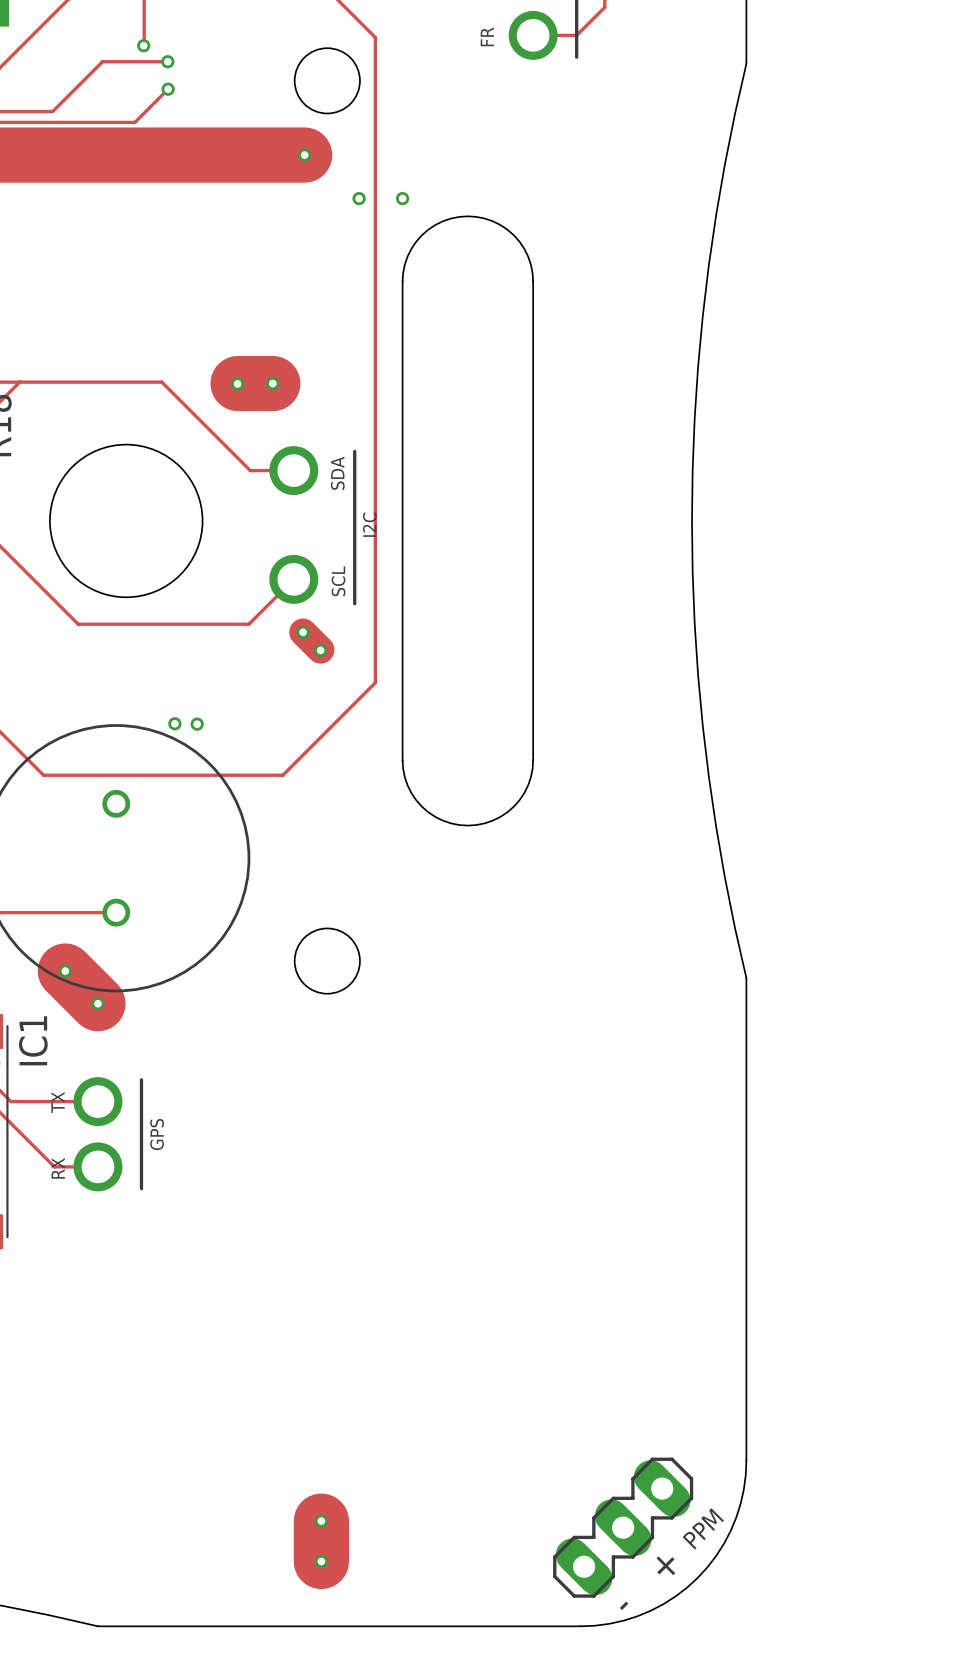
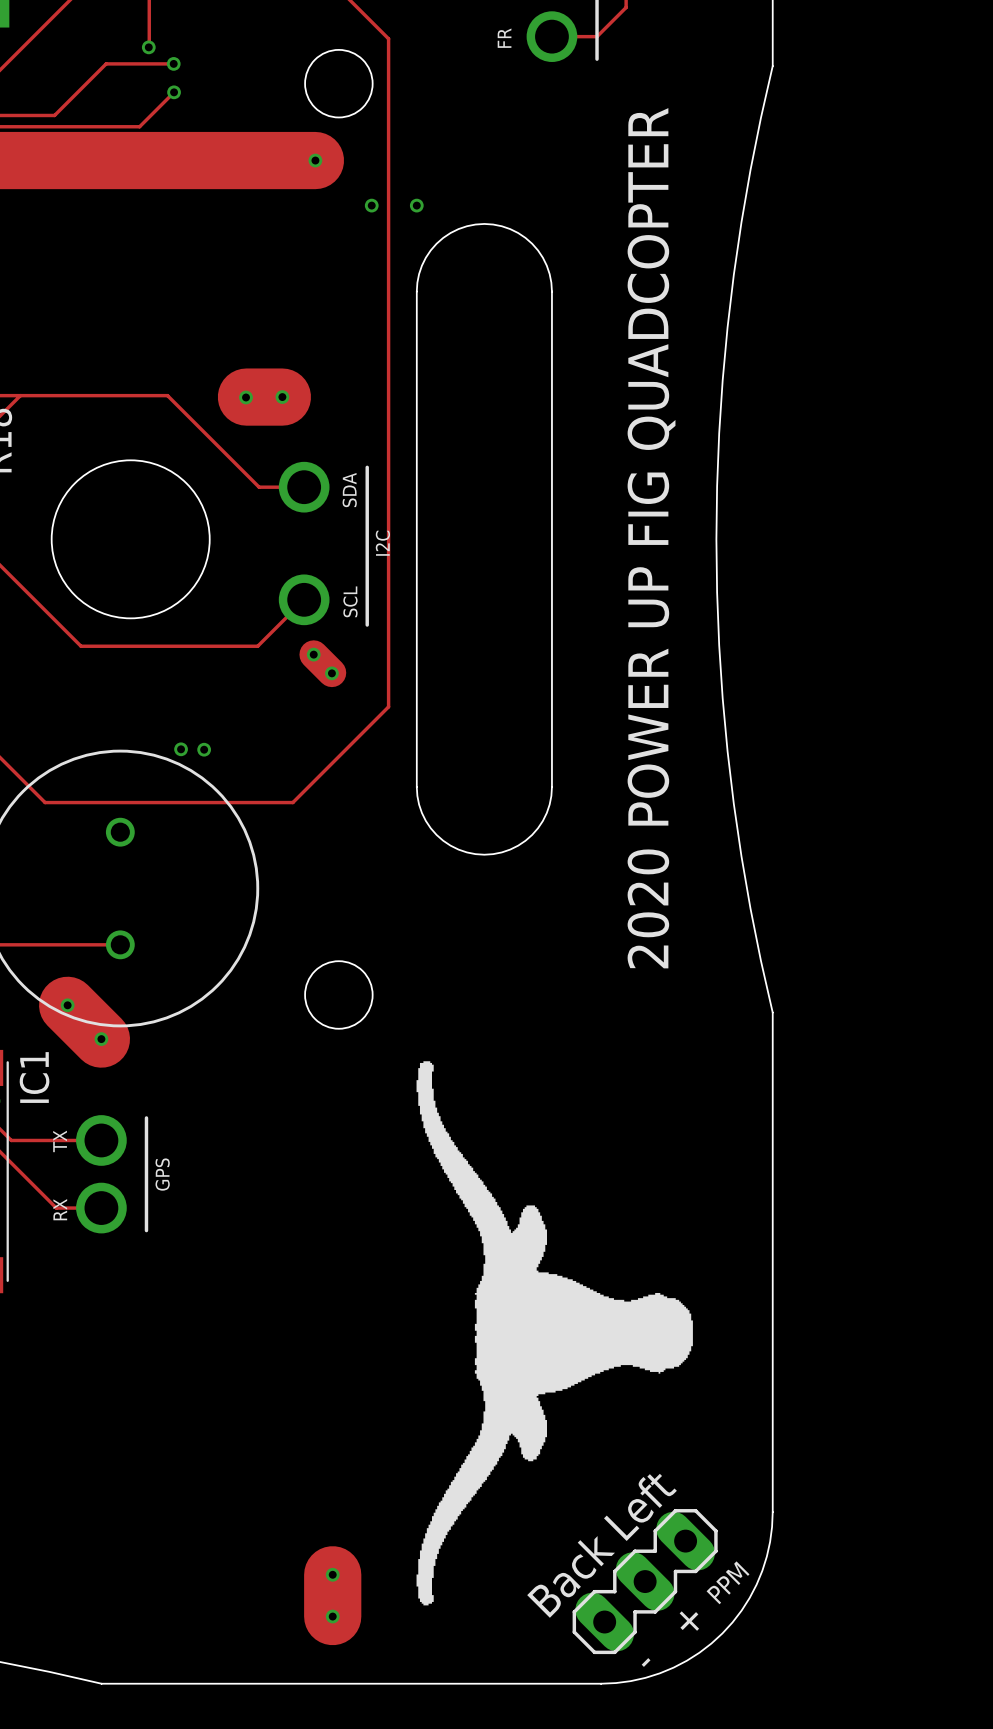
text: none -> 2020 POWER UP FIG QUADCOPTER (651, 538)
drawing: none -> [416, 1061, 693, 1606]
text: none -> Back Left (602, 1545)

